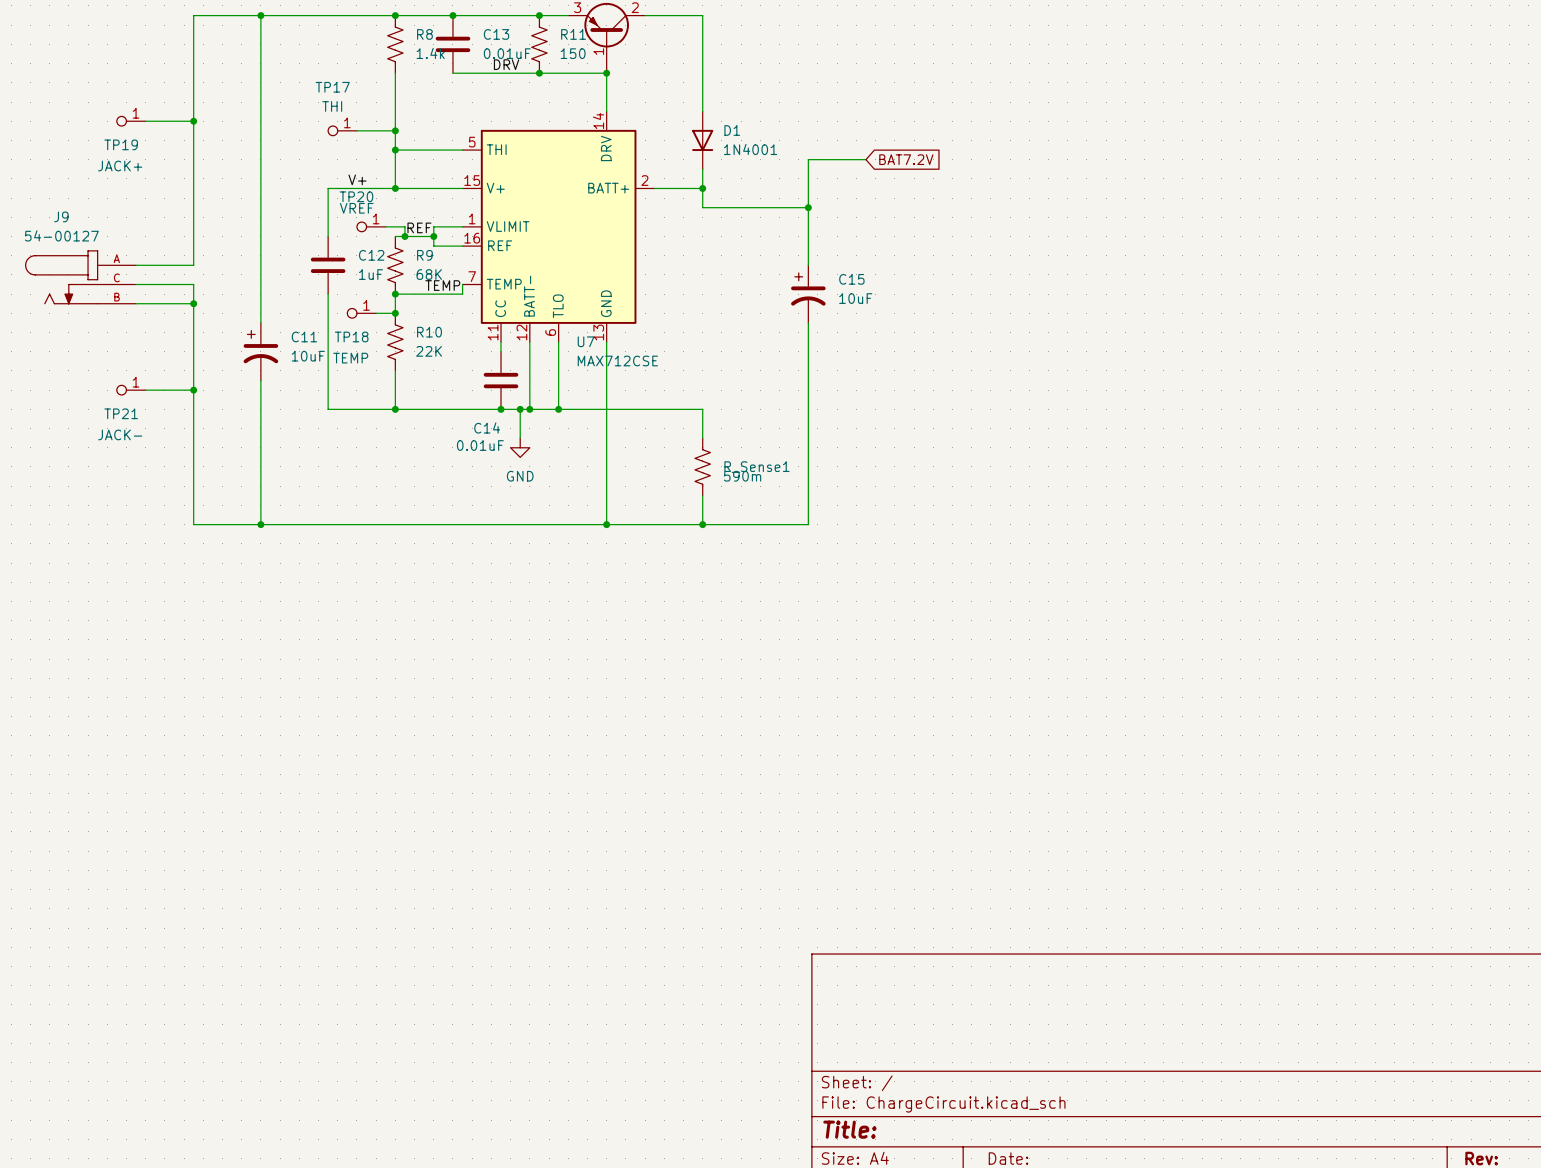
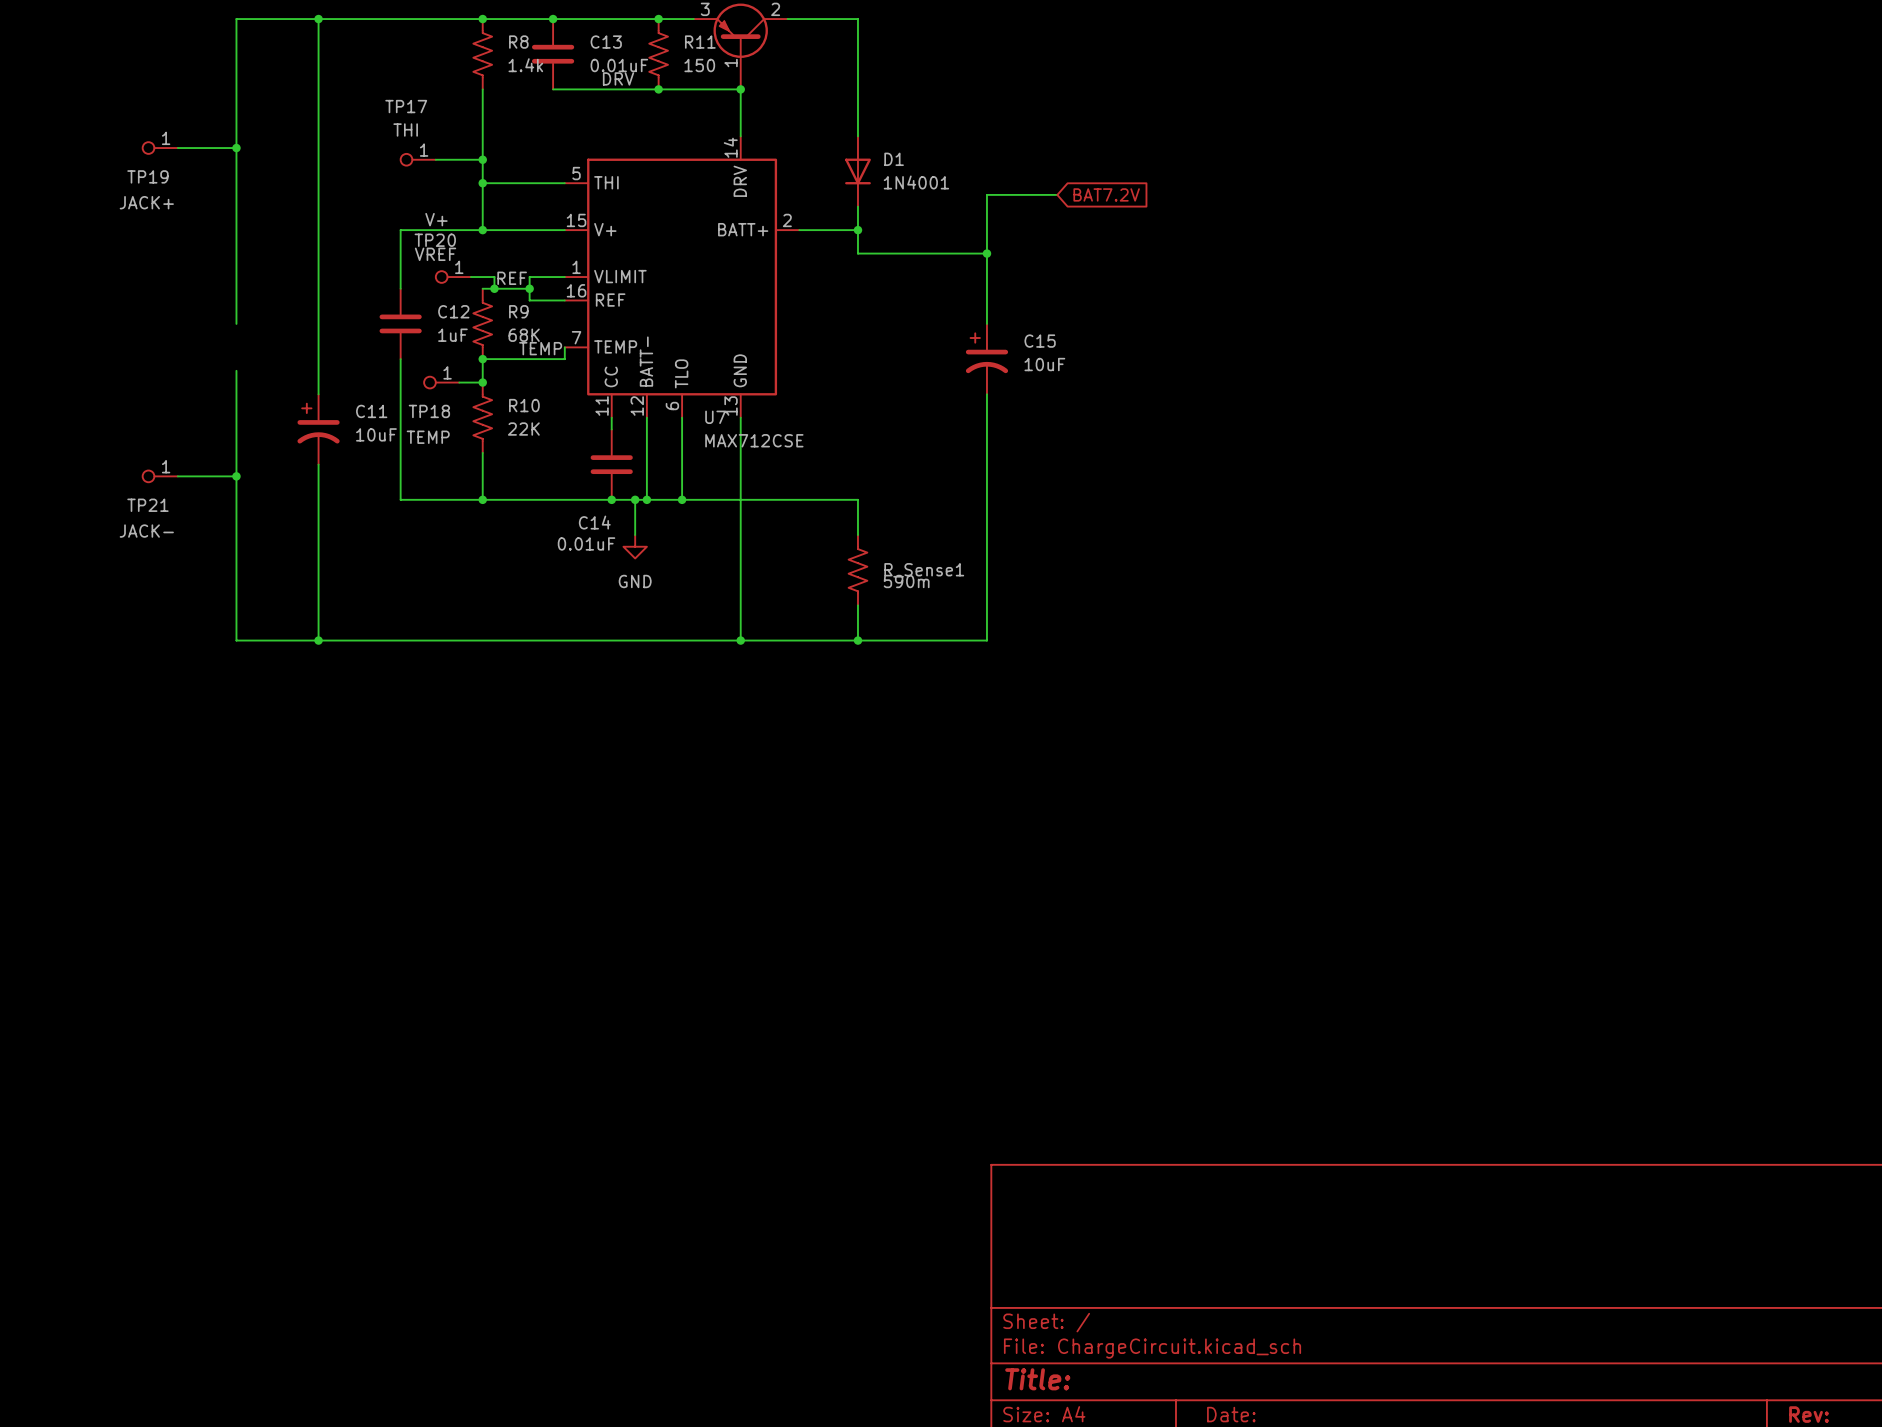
wire: (136, 265) (193, 265) -> none
J9: 54-00127 (80, 277) -> none
wire: (136, 284) (193, 284) (193, 303) (136, 303) -> none
junction: (193, 303) -> none

